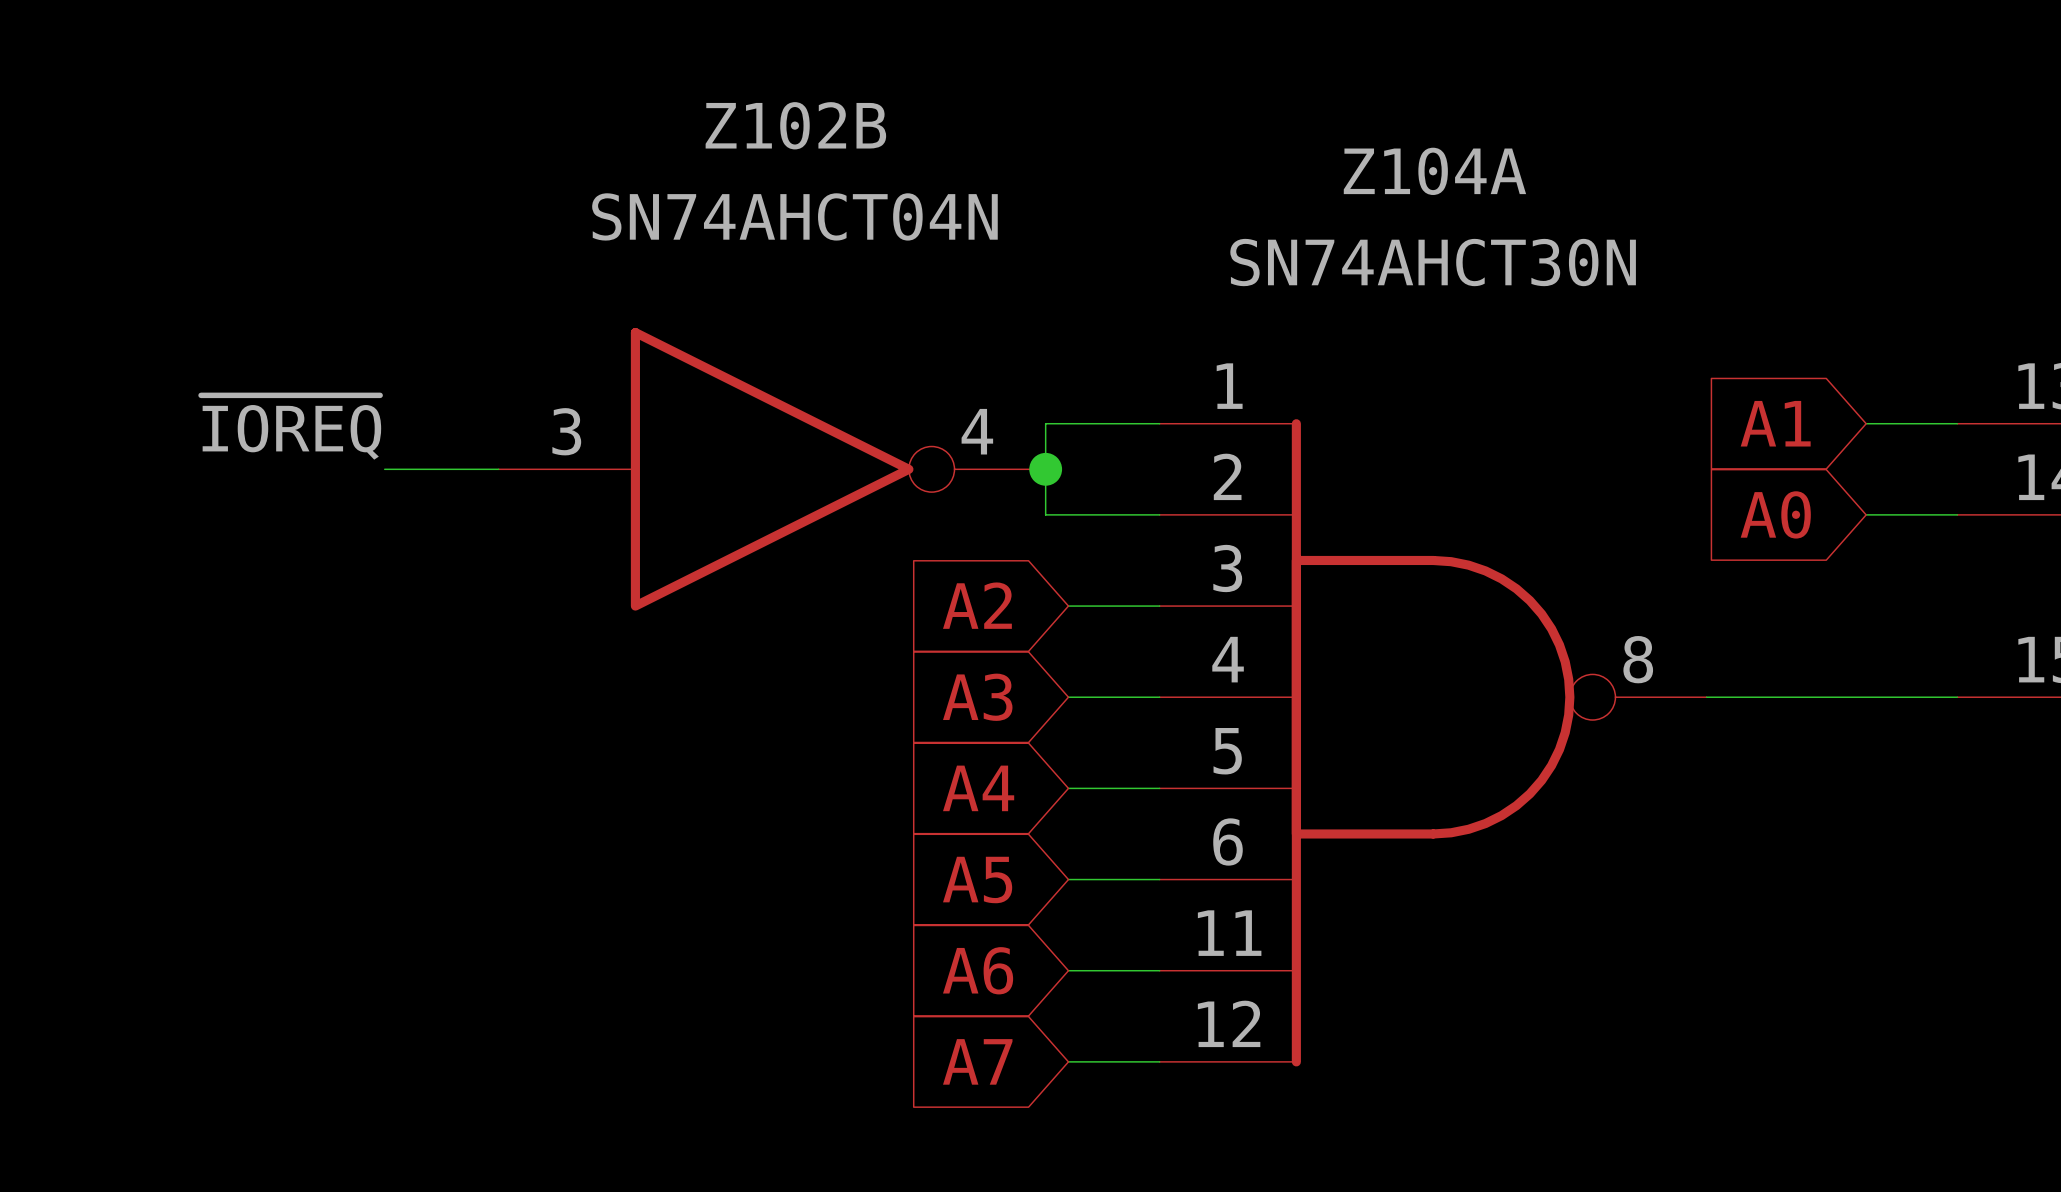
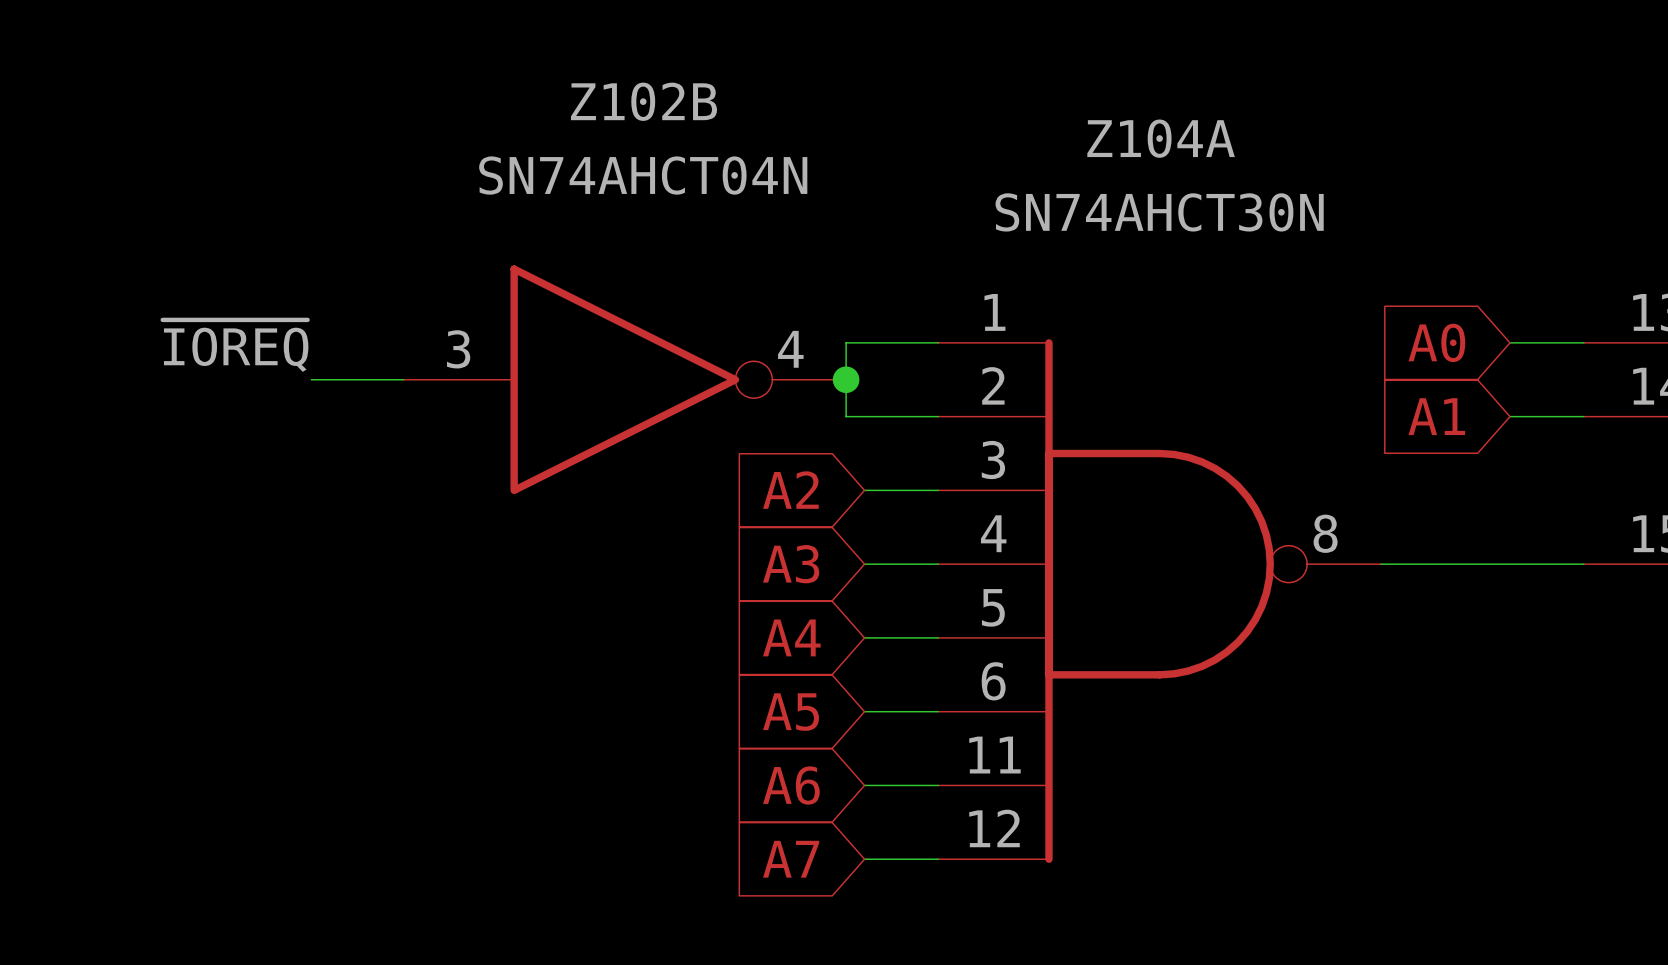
global label: A1 (1775, 423) -> A0 (1436, 342)
global label: A0 (1775, 514) -> A1 (1436, 416)

